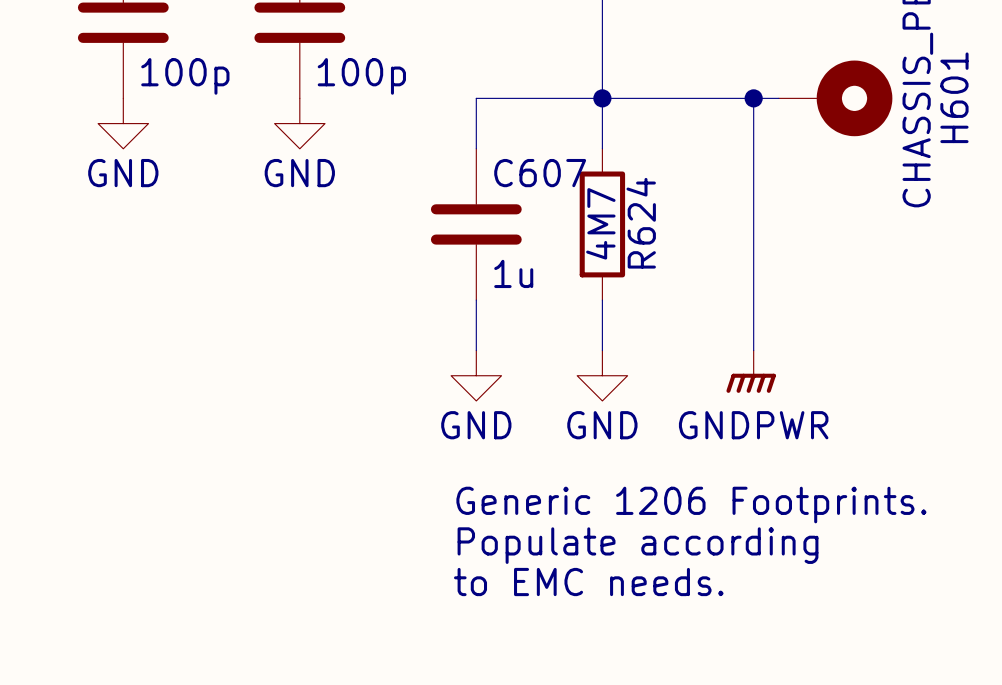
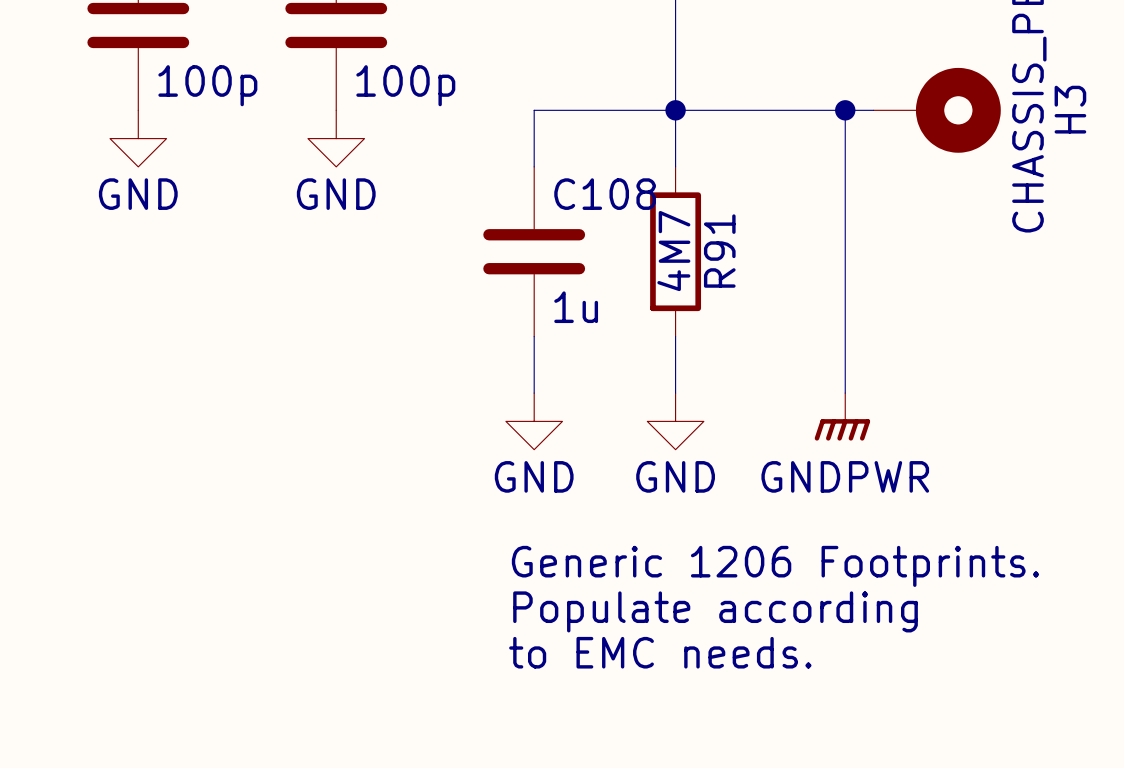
H601 name: H601 (954, 97) -> H3 (1070, 109)
C607 name: C607 (540, 173) -> C108 (605, 194)
R624 name: R624 (641, 223) -> R91 (719, 251)

